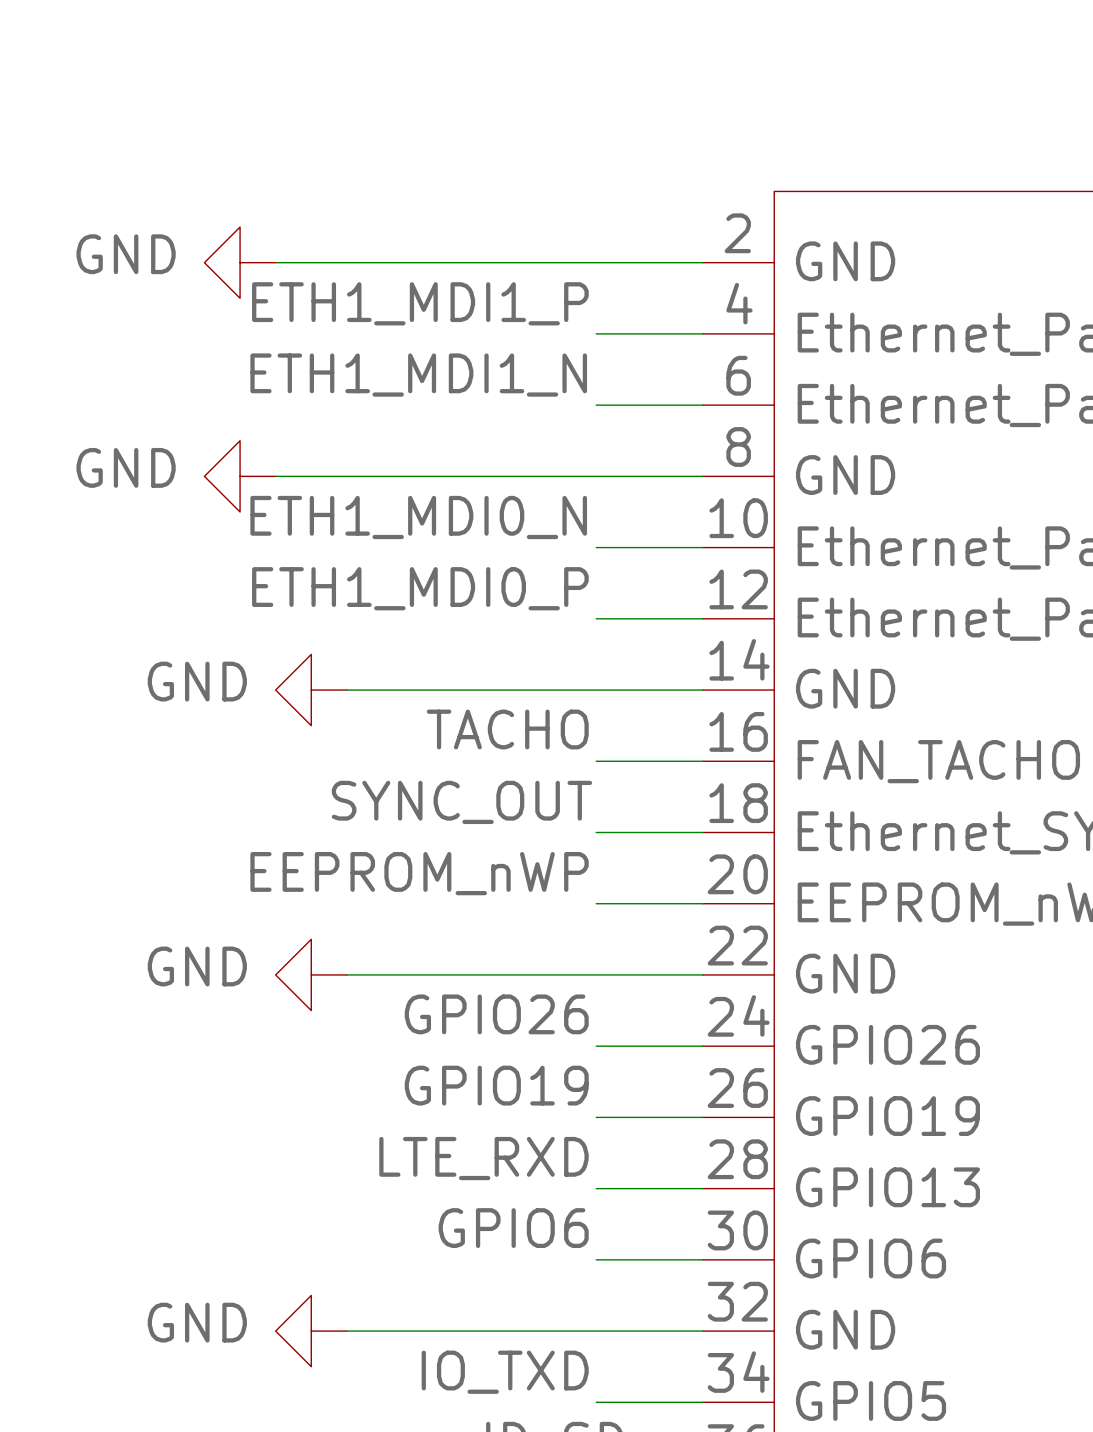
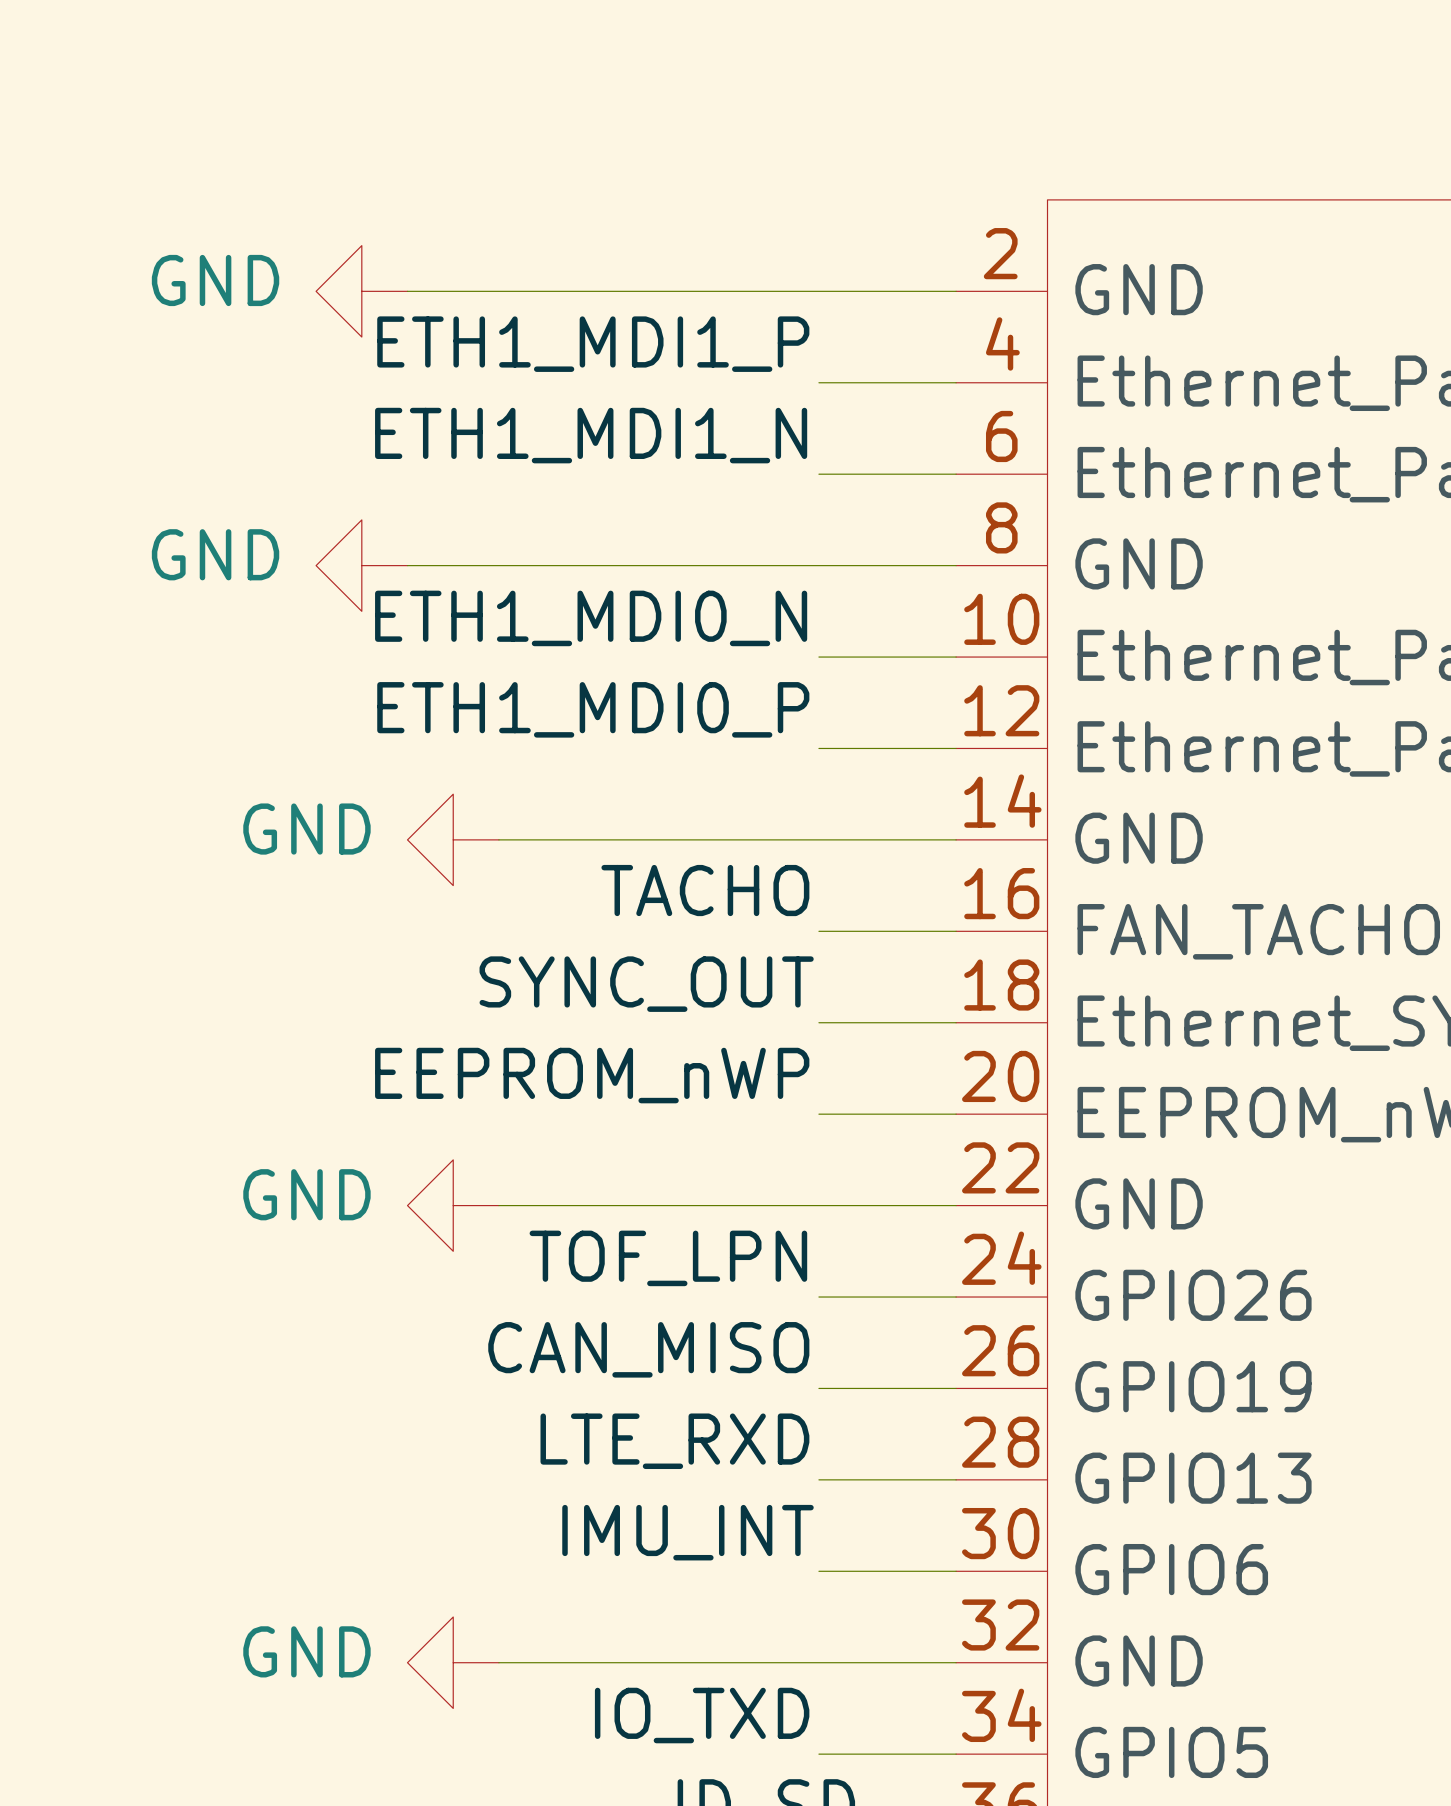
label: GPIO26 (496, 1014) -> TOF_LPN (668, 1258)
label: GPIO19 (496, 1085) -> CAN_MISO (648, 1349)
label: GPIO6 (513, 1228) -> IMU_INT (687, 1532)

